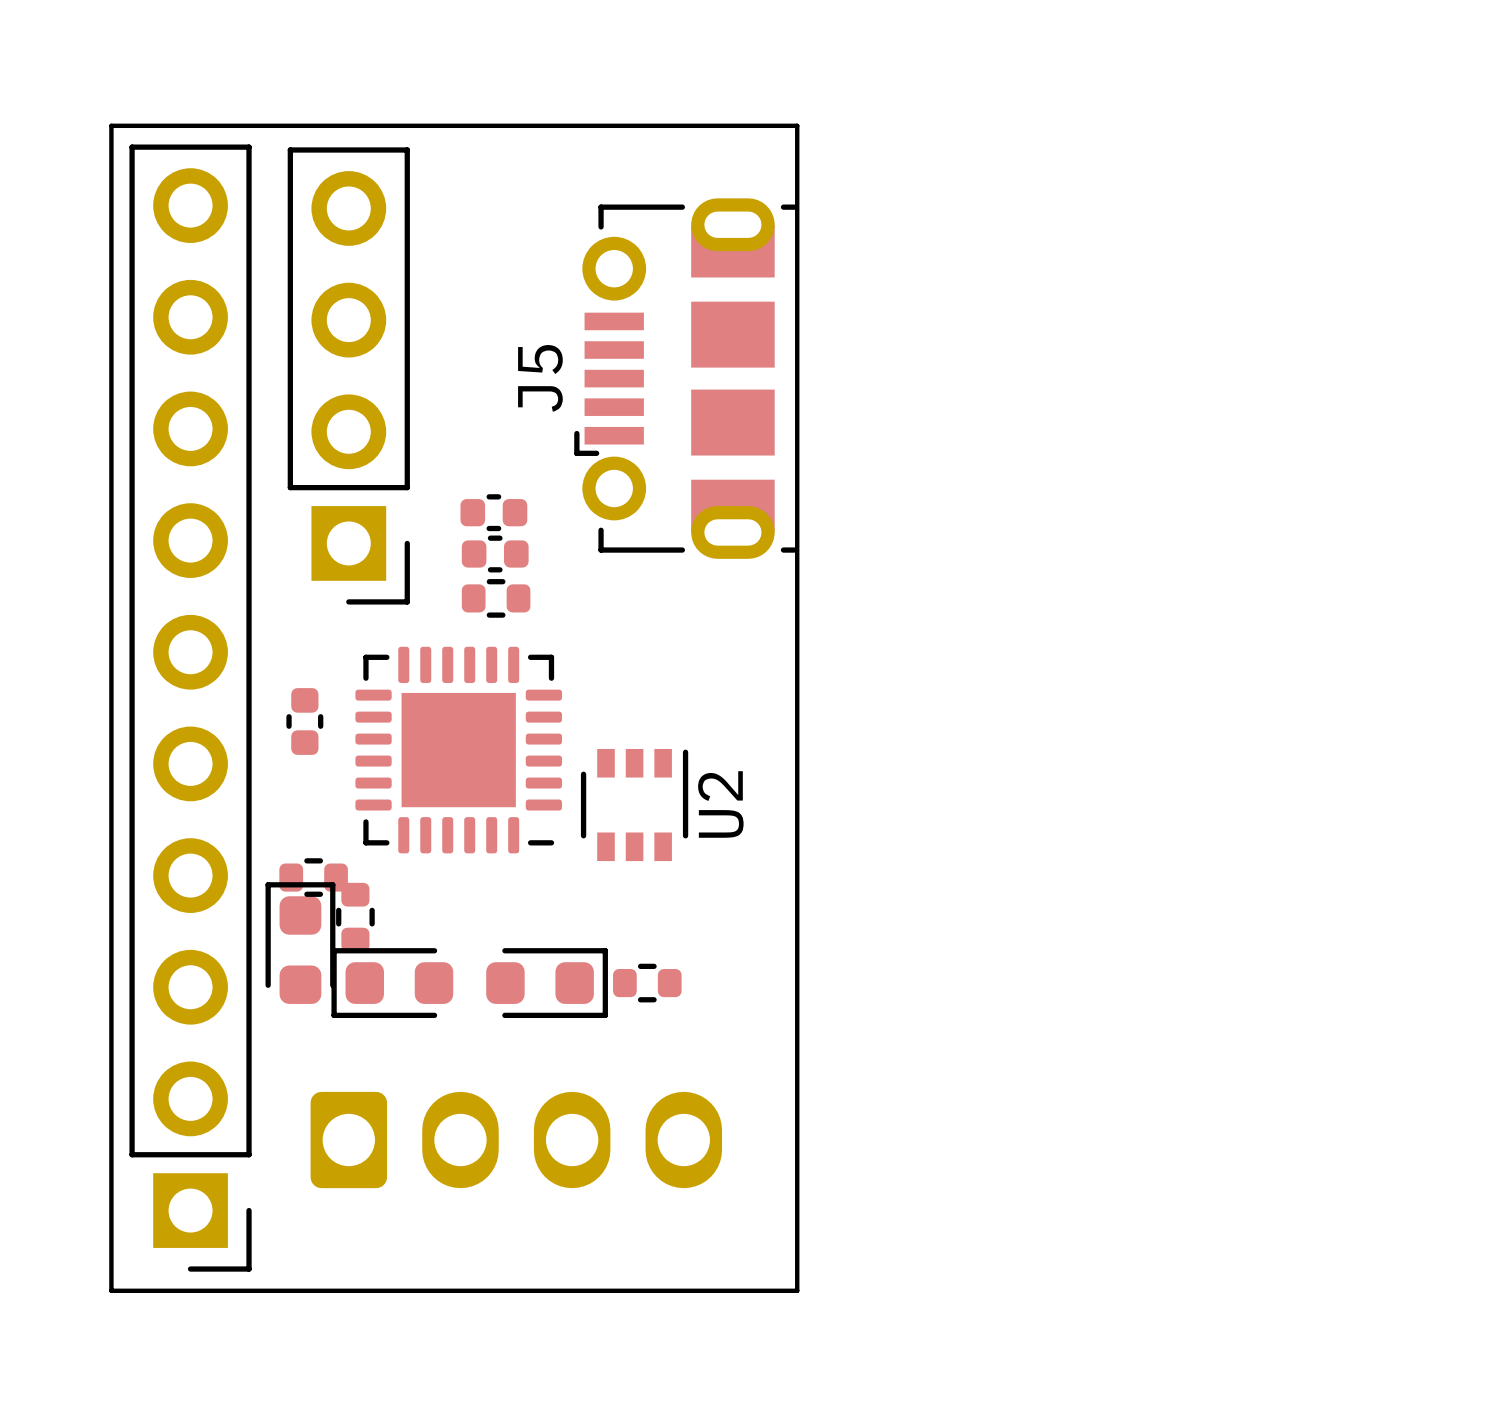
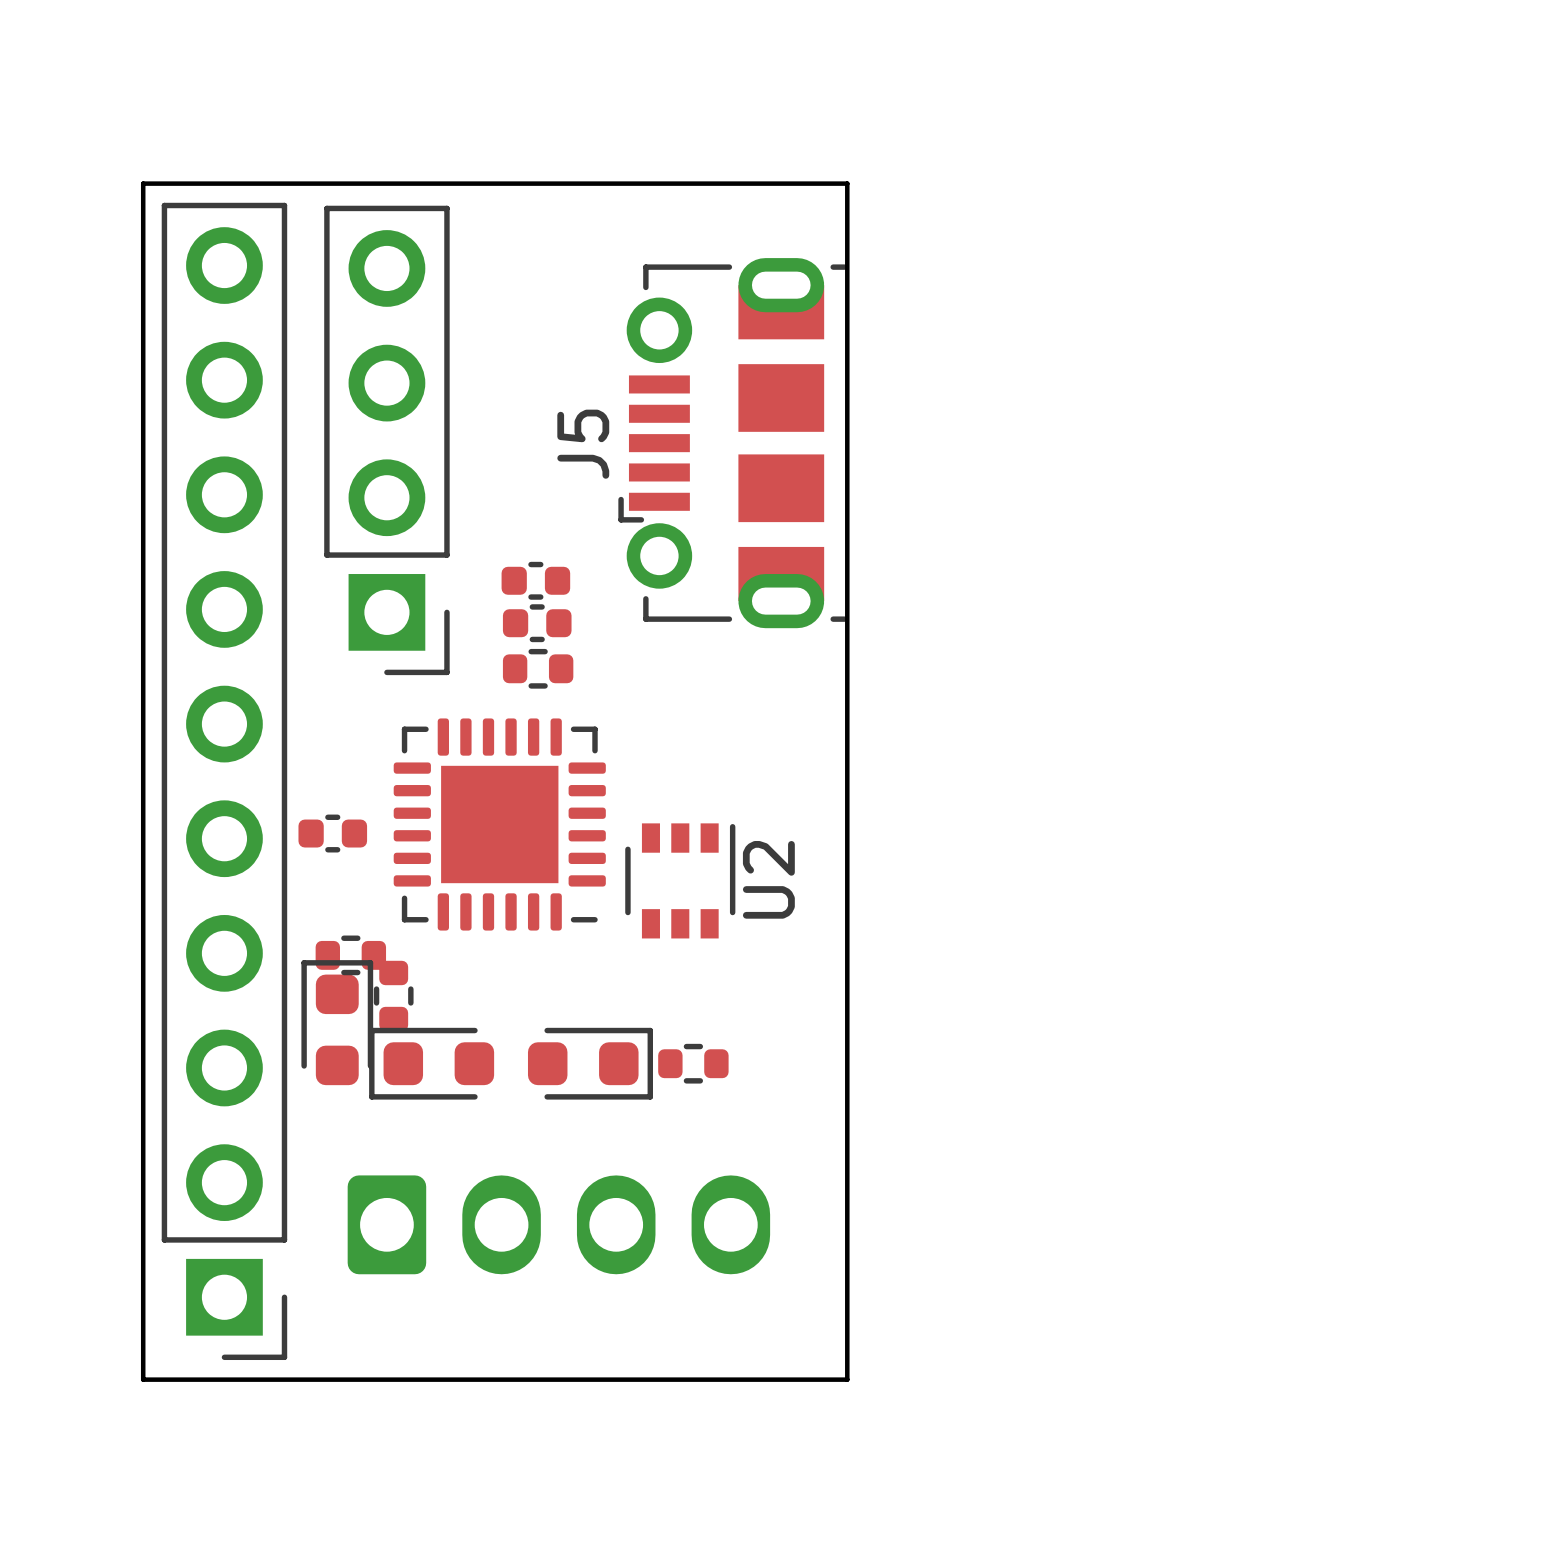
part rotation: 0° (304, 721) -> 90° clockwise (332, 833)

